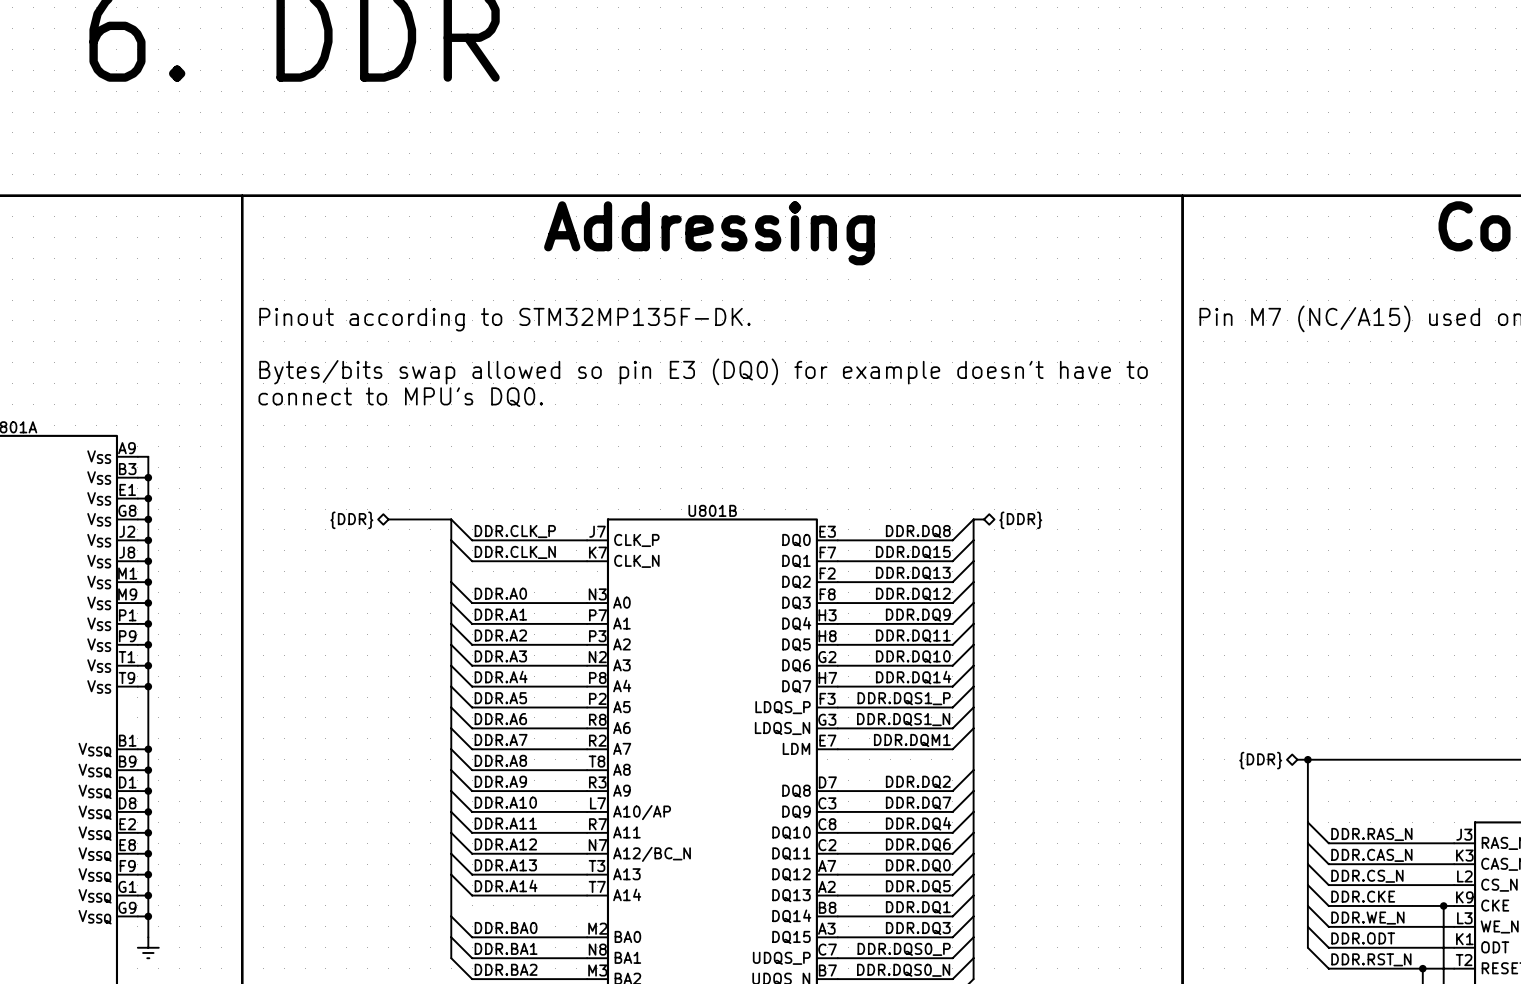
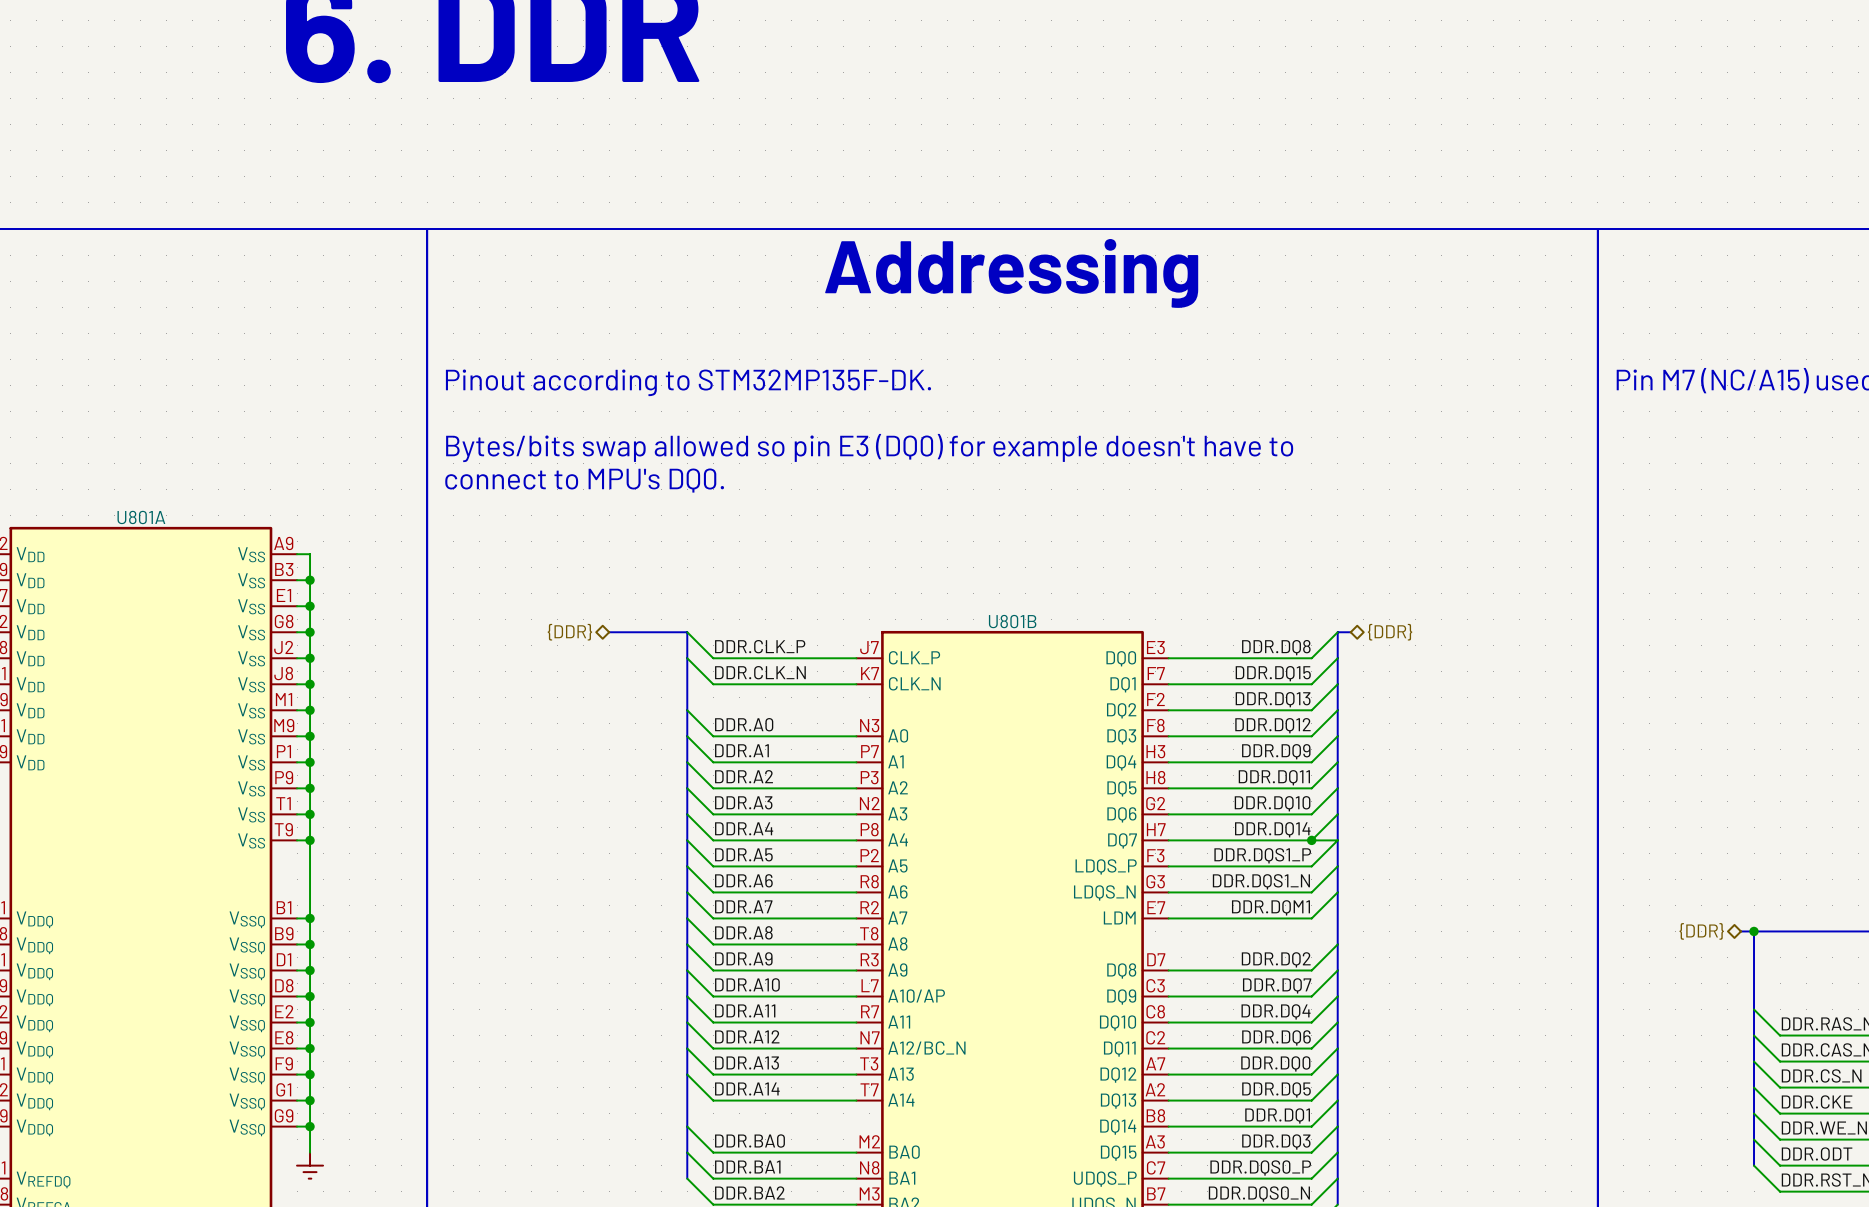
wire: none -> (1311, 840) (1337, 840)
junction: none -> (1311, 840)

